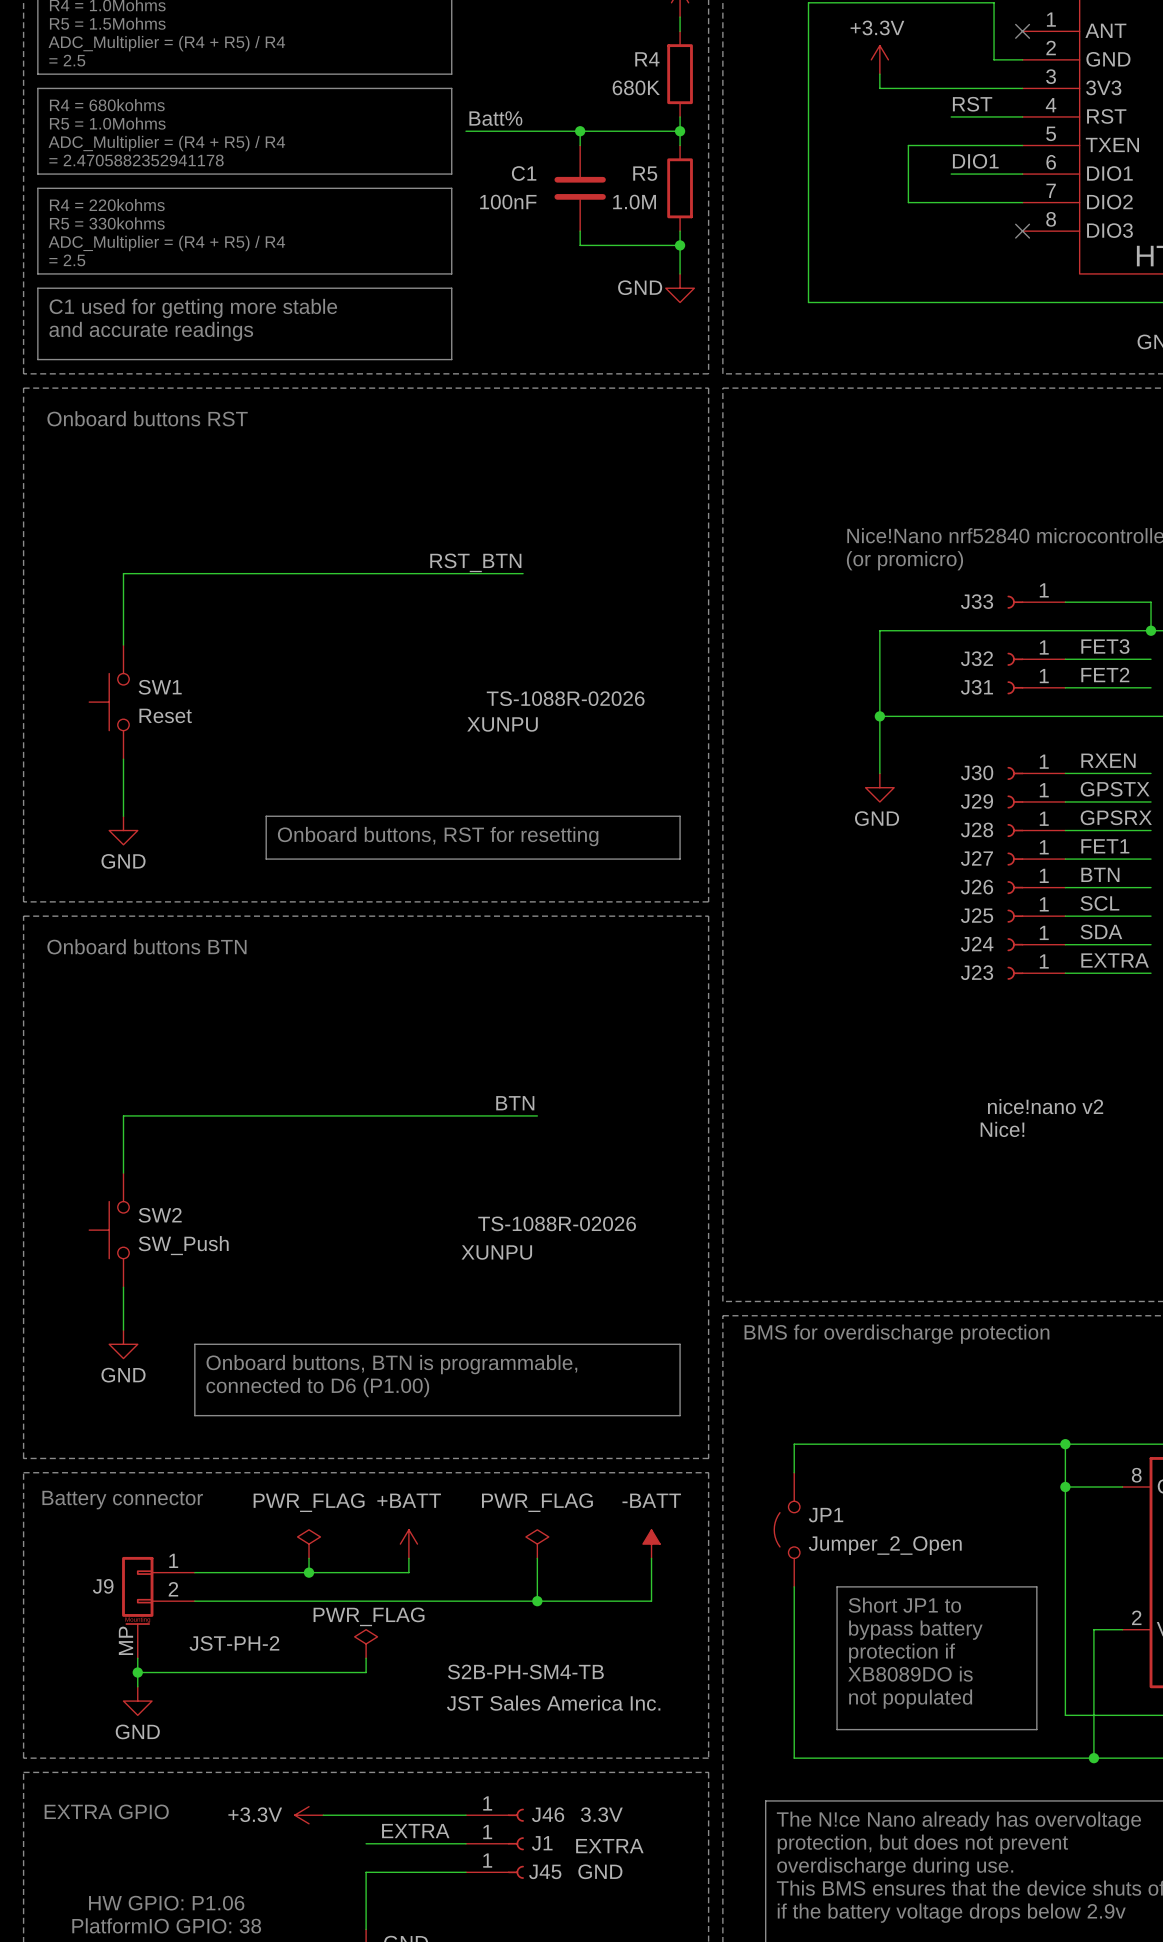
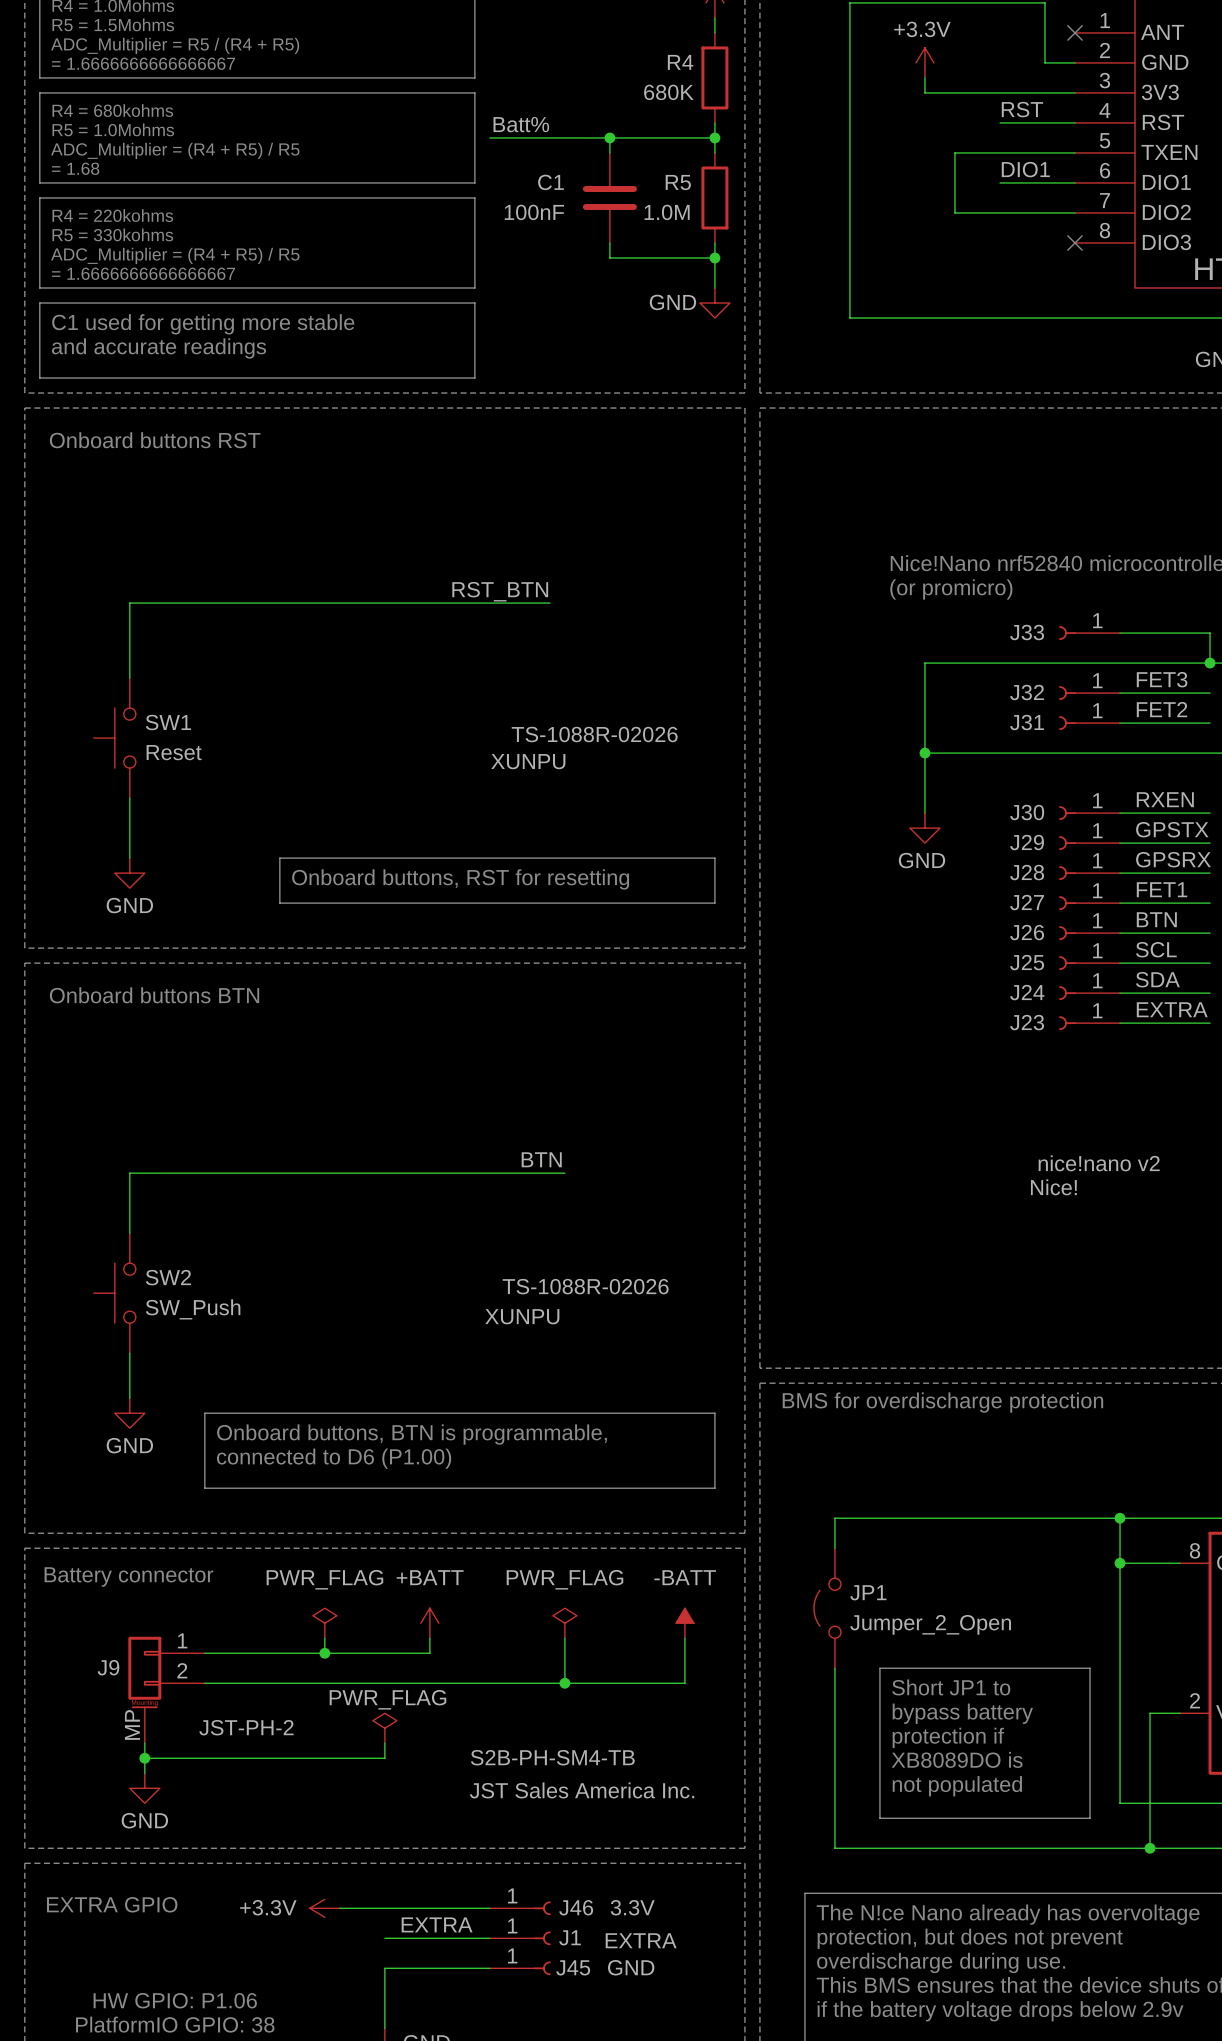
text: ADC_Multiplier = (R4 + R5) / R4 (166, 43) -> ADC_Multiplier = R5 / (R4 + R5) (175, 45)
text: = 2.5 (67, 60) -> = 1.6666666666666667 (143, 63)
text: ADC_Multiplier = (R4 + R5) / R4 (166, 143) -> ADC_Multiplier = (R4 + R5) / R5 (175, 150)
text: = 2.4705882352941178 (136, 160) -> = 1.68 (75, 168)
text: ADC_Multiplier = (R4 + R5) / R4 (166, 243) -> ADC_Multiplier = (R4 + R5) / R5 (175, 255)
text: = 2.5 (67, 260) -> = 1.6666666666666667 (143, 273)

